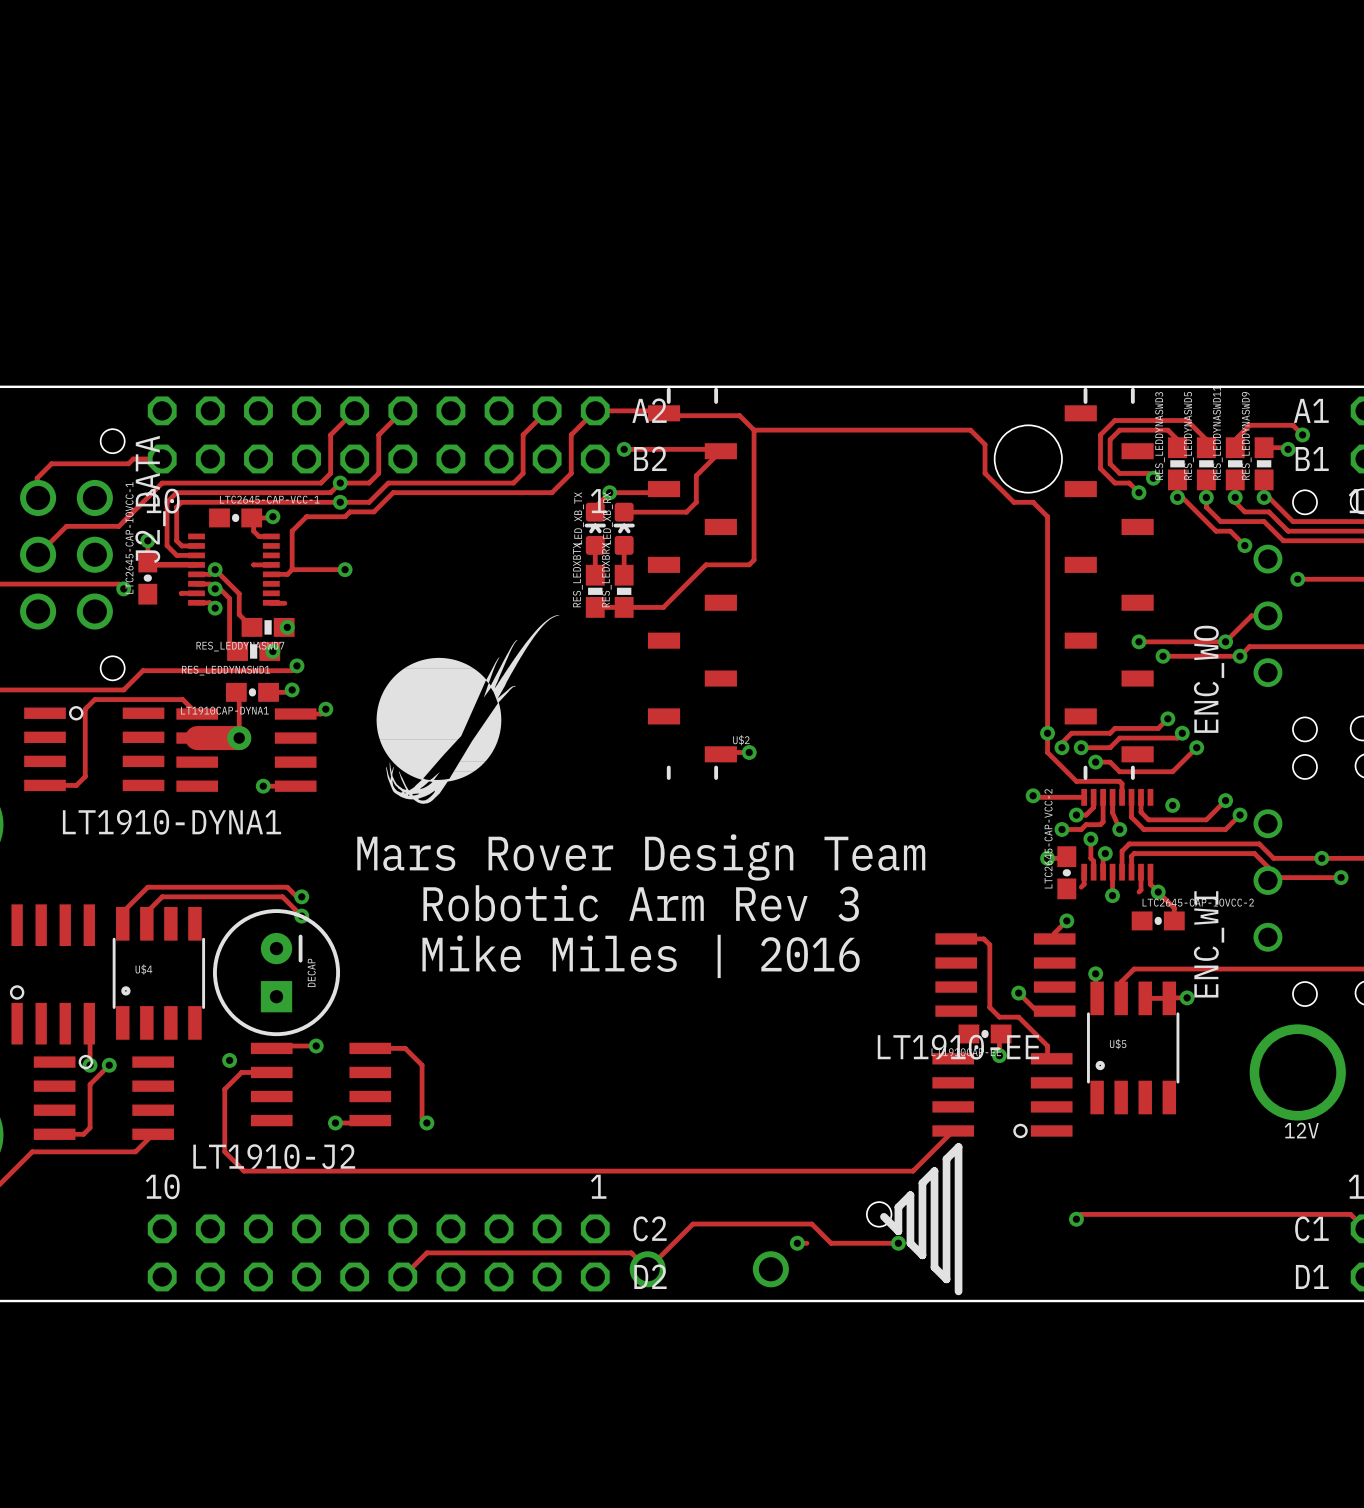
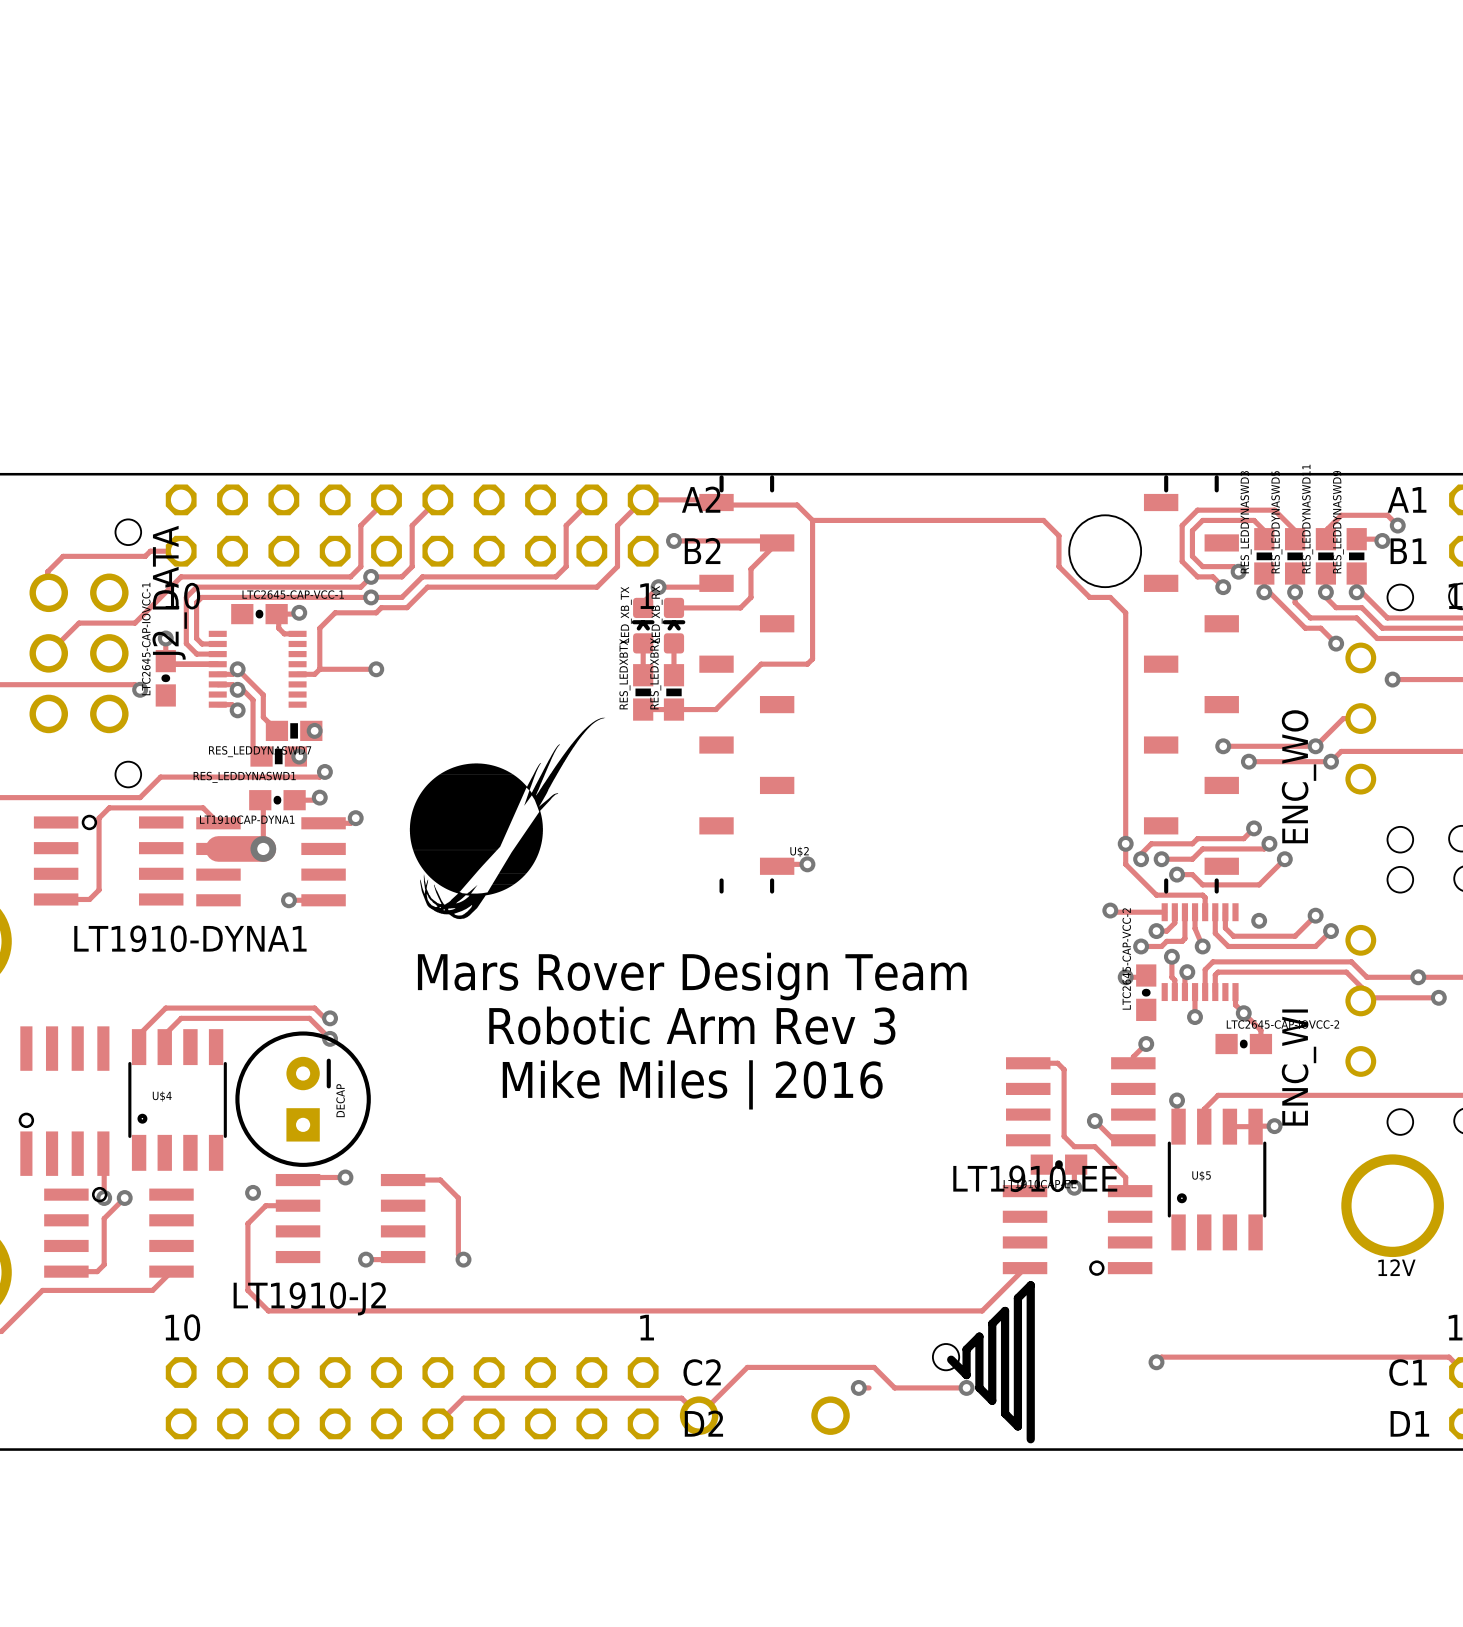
track: (253, 564) (271, 564) -> none
track: (196, 593) (181, 593) -> none
track: (270, 603) (284, 603) -> none
track: (1084, 872) (1084, 884) (1081, 887) -> none
track: (1141, 872) (1141, 890) (1138, 892) -> none

